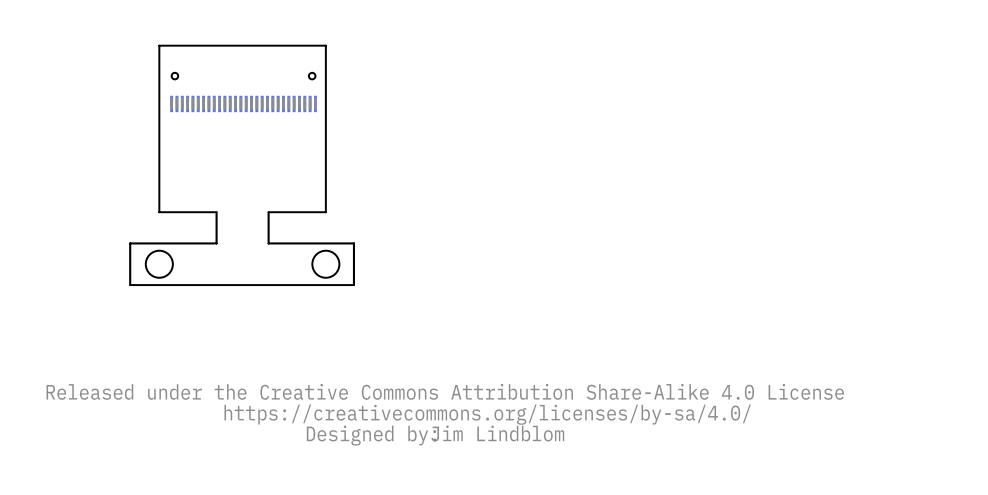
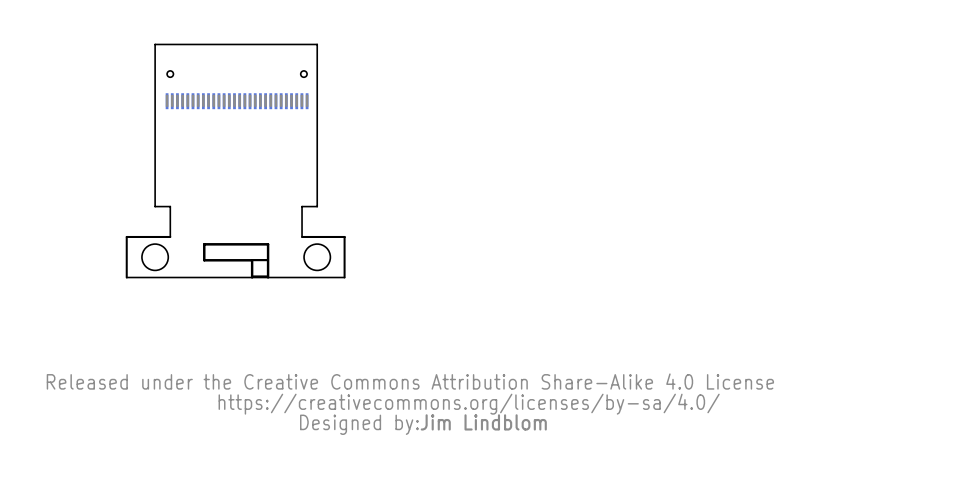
board edge: (174, 212) (216, 212) (216, 243) (174, 243) -> (170, 206) (170, 236)
board edge: (310, 212) (268, 212) (268, 243) (310, 243) -> (302, 206) (302, 236)
part: none -> (236, 260)

